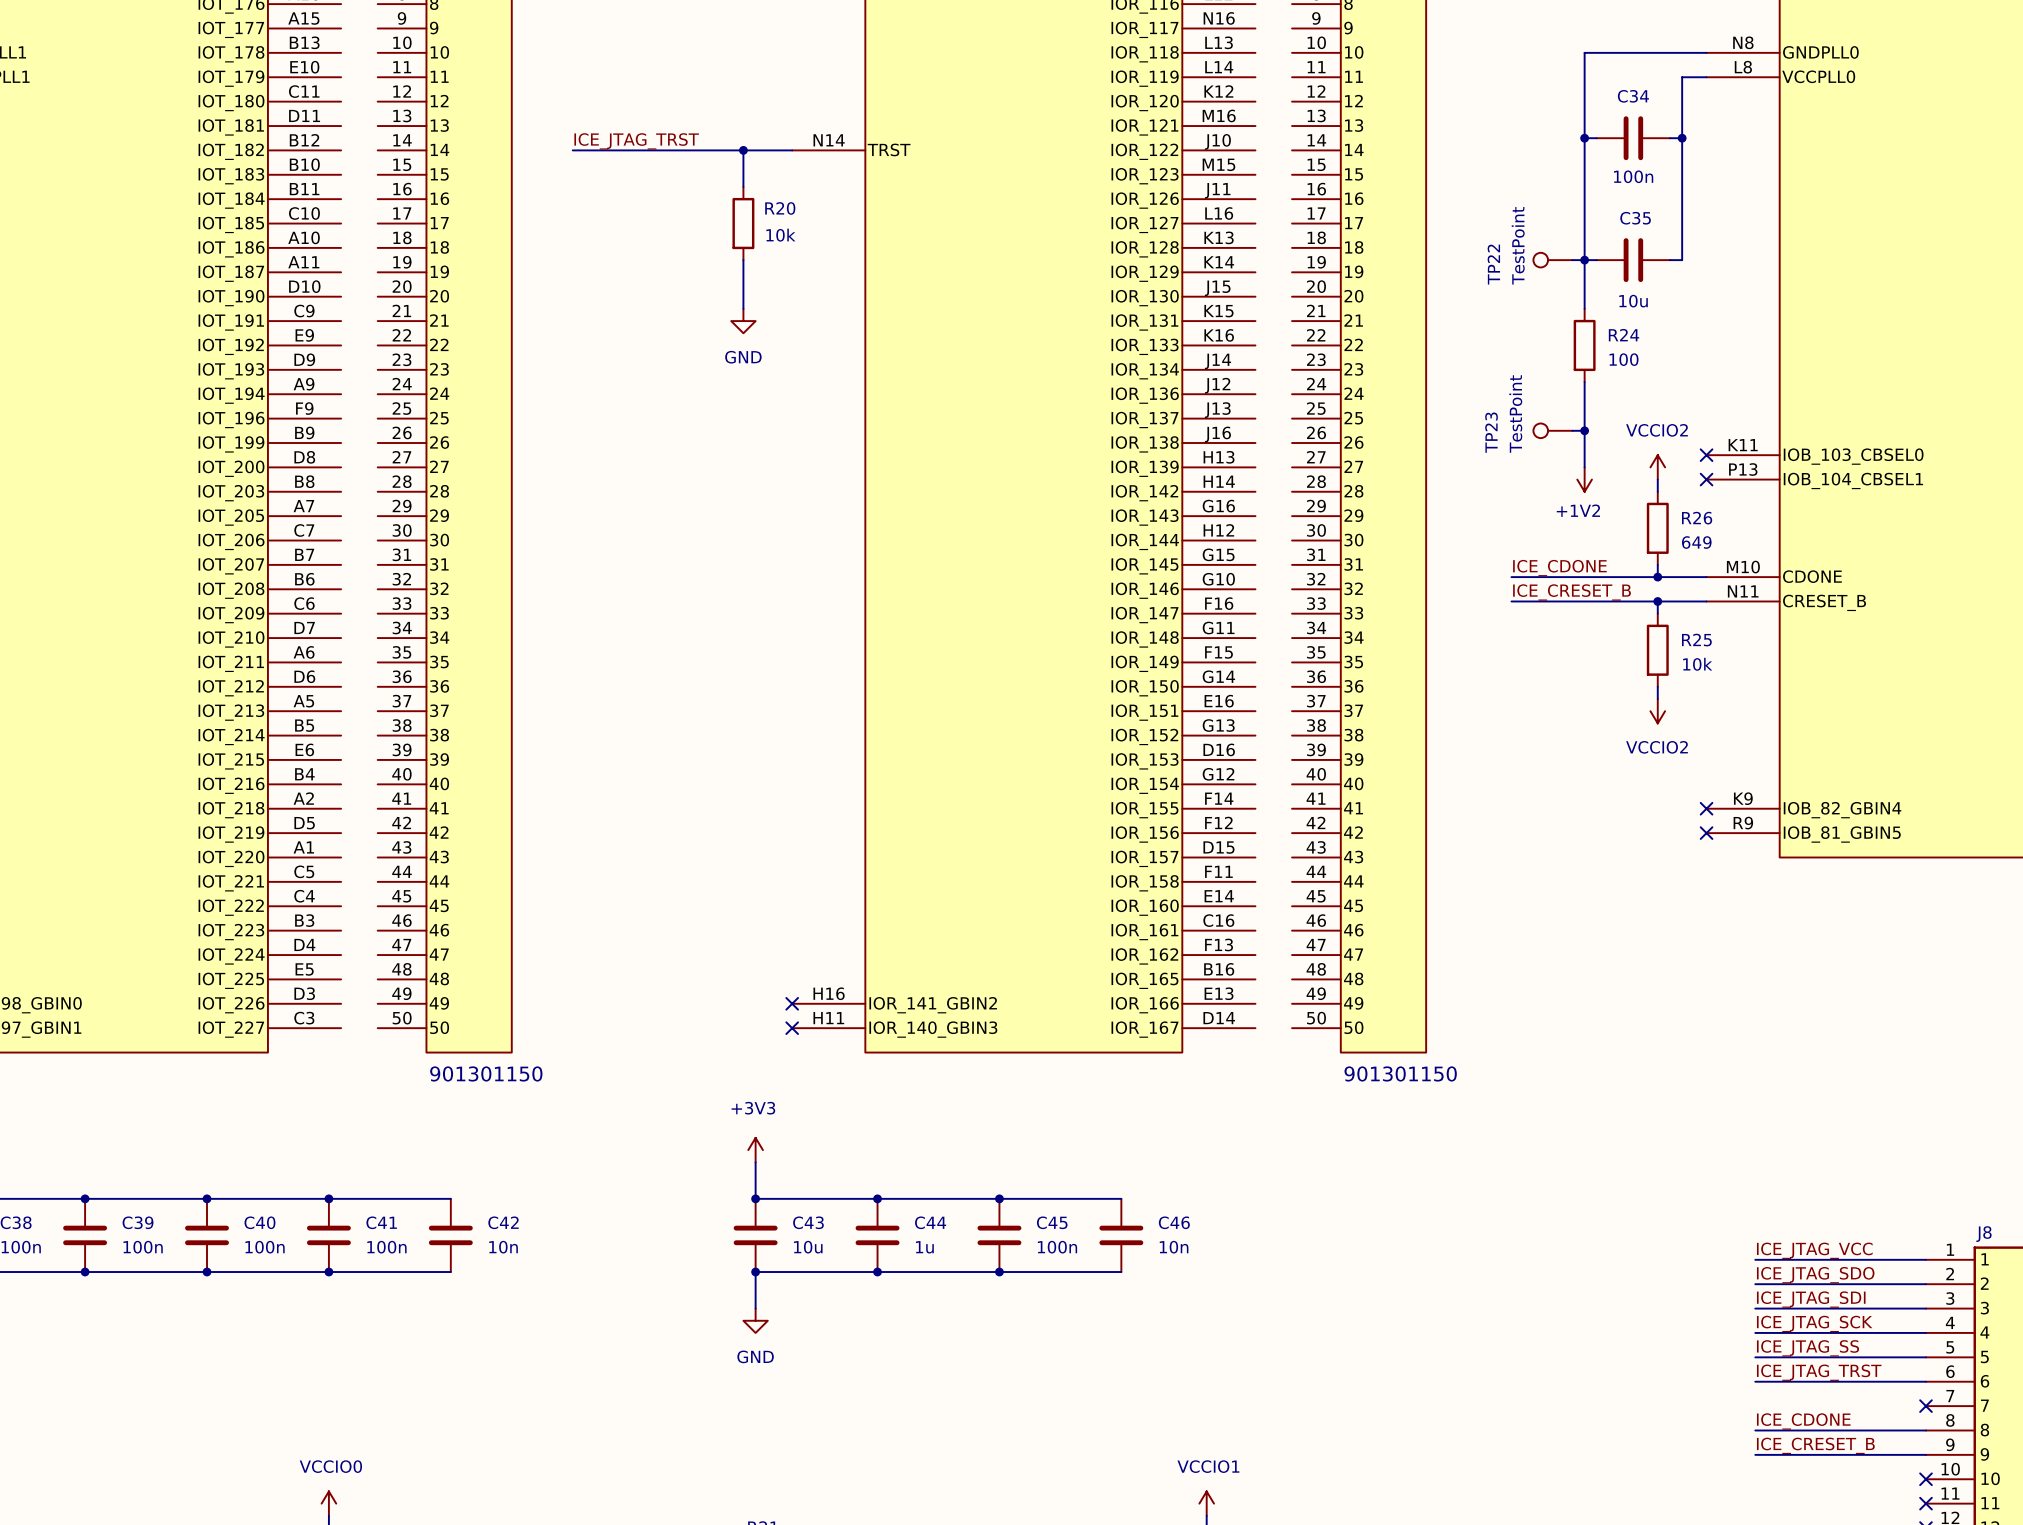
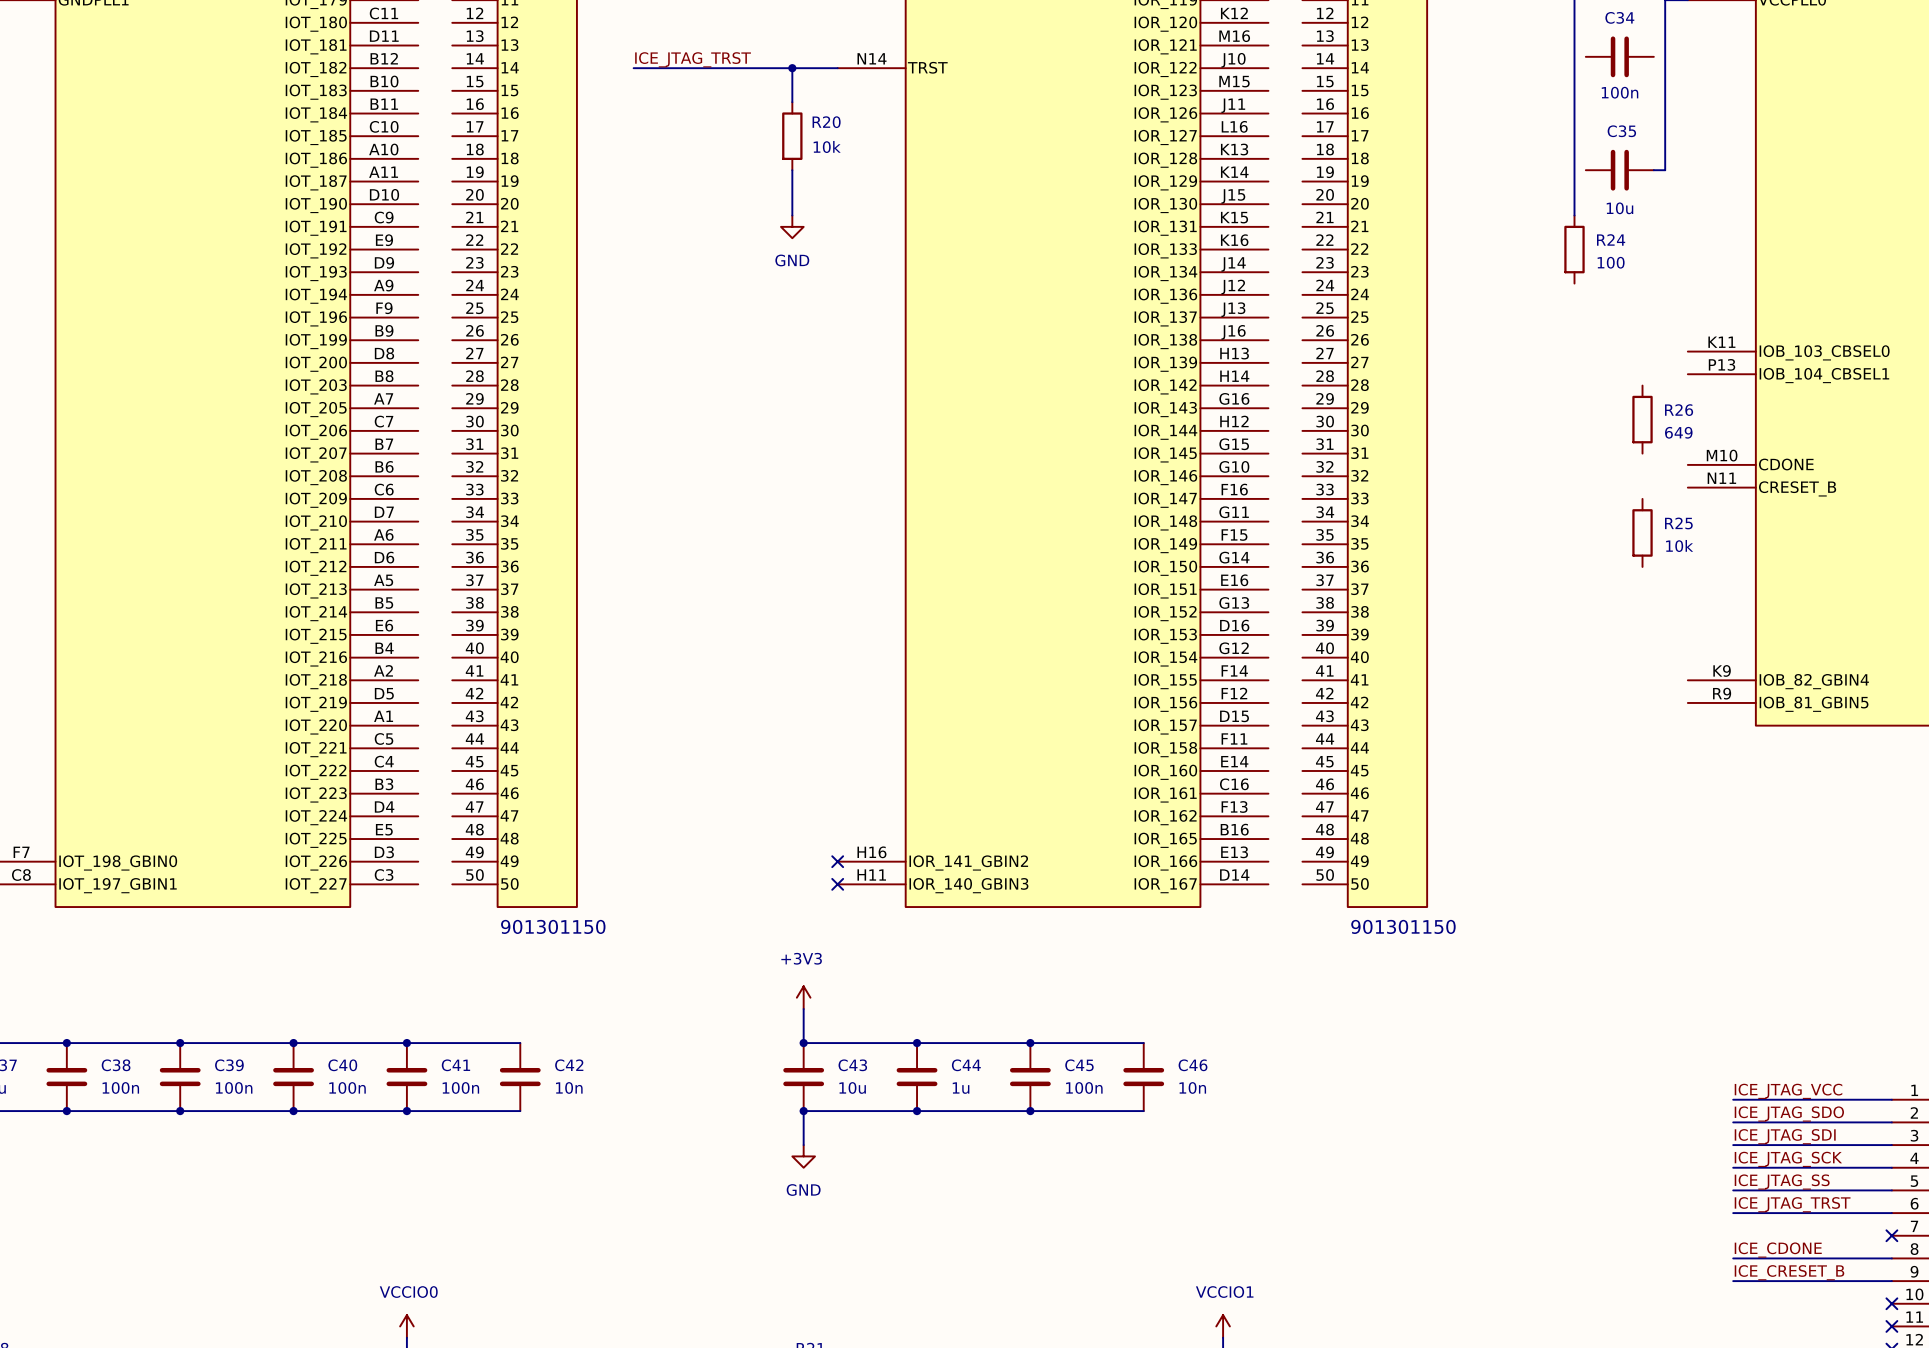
wire: (1584, 138) (1596, 138) -> none
junction: (1584, 138) -> none
wire: (1669, 138) (1682, 138) -> none
junction: (1682, 138) -> none
TP22: TestPoint (1552, 260) -> none
wire: (1572, 260) (1596, 260) -> none
junction: (1584, 260) -> none
wire: (1584, 382) (1584, 467) -> none
TP23: TestPoint (1552, 430) -> none
wire: (1572, 430) (1584, 430) -> none
junction: (1584, 430) -> none
no-connect mark: (1706, 455) -> none
power symbol: VCCIO2 (1657, 467) -> none
power symbol: +1V2 (1584, 479) -> none
wire: (1657, 479) (1657, 491) -> none
no-connect mark: (1706, 479) -> none
wire: (1657, 564) (1657, 577) -> none
label: ICE_CDONE (1559, 568) -> none
wire: (1511, 577) (1706, 577) -> none
junction: (1657, 577) -> none
label: ICE_CRESET_B (1572, 592) -> none
wire: (1511, 601) (1706, 601) -> none
wire: (1657, 601) (1657, 613) -> none
junction: (1657, 601) -> none
wire: (1657, 686) (1657, 699) -> none
power symbol: VCCIO2 (1657, 711) -> none
no-connect mark: (1706, 808) -> none
no-connect mark: (1706, 833) -> none

